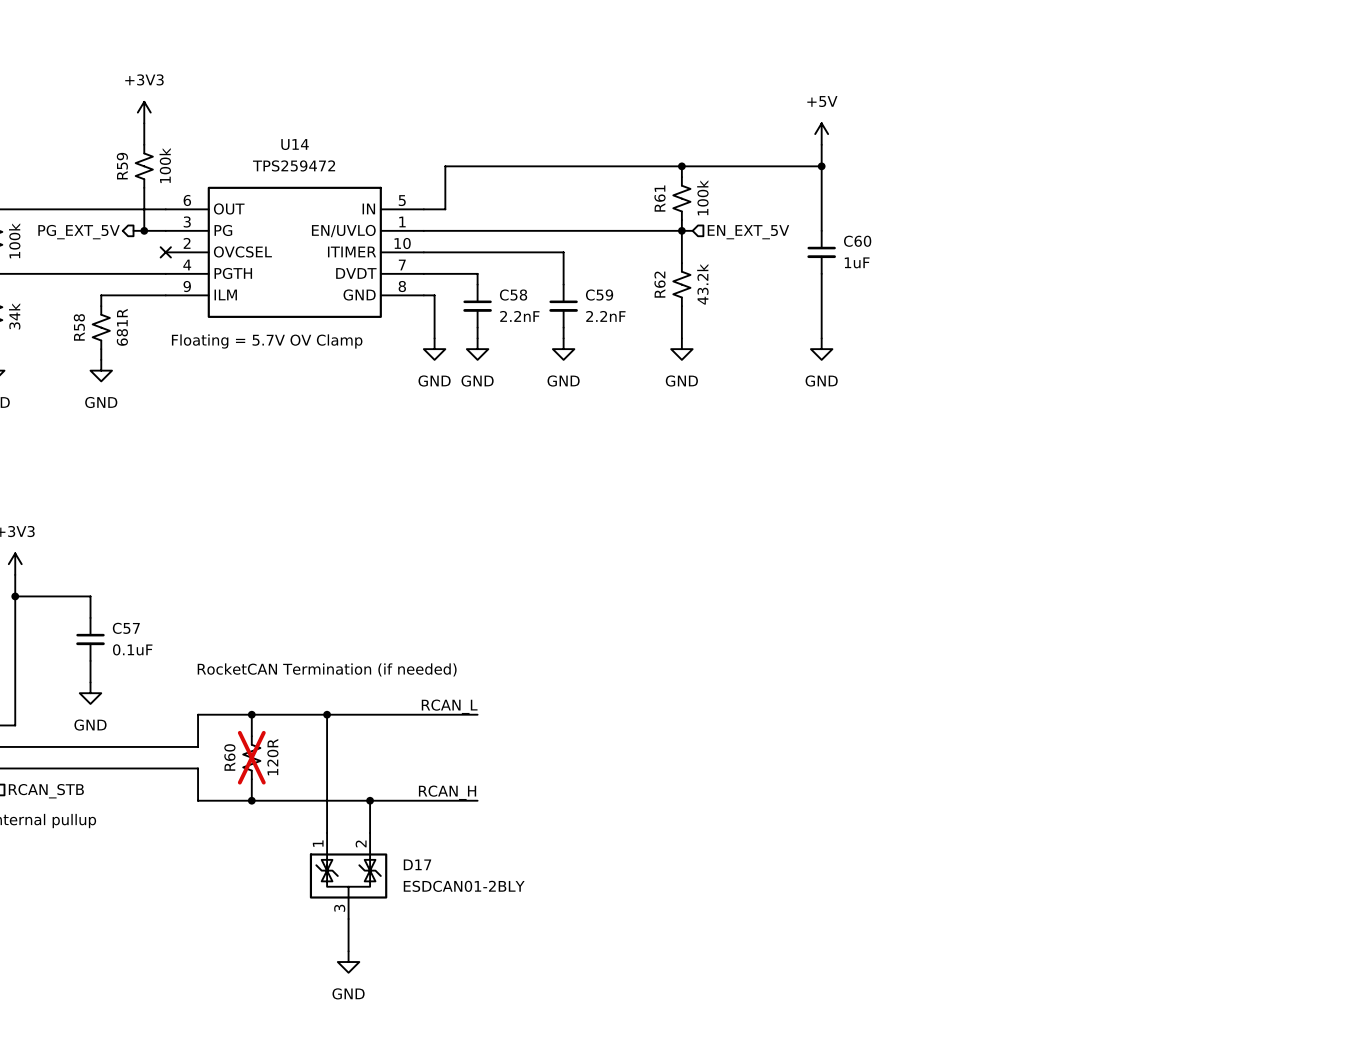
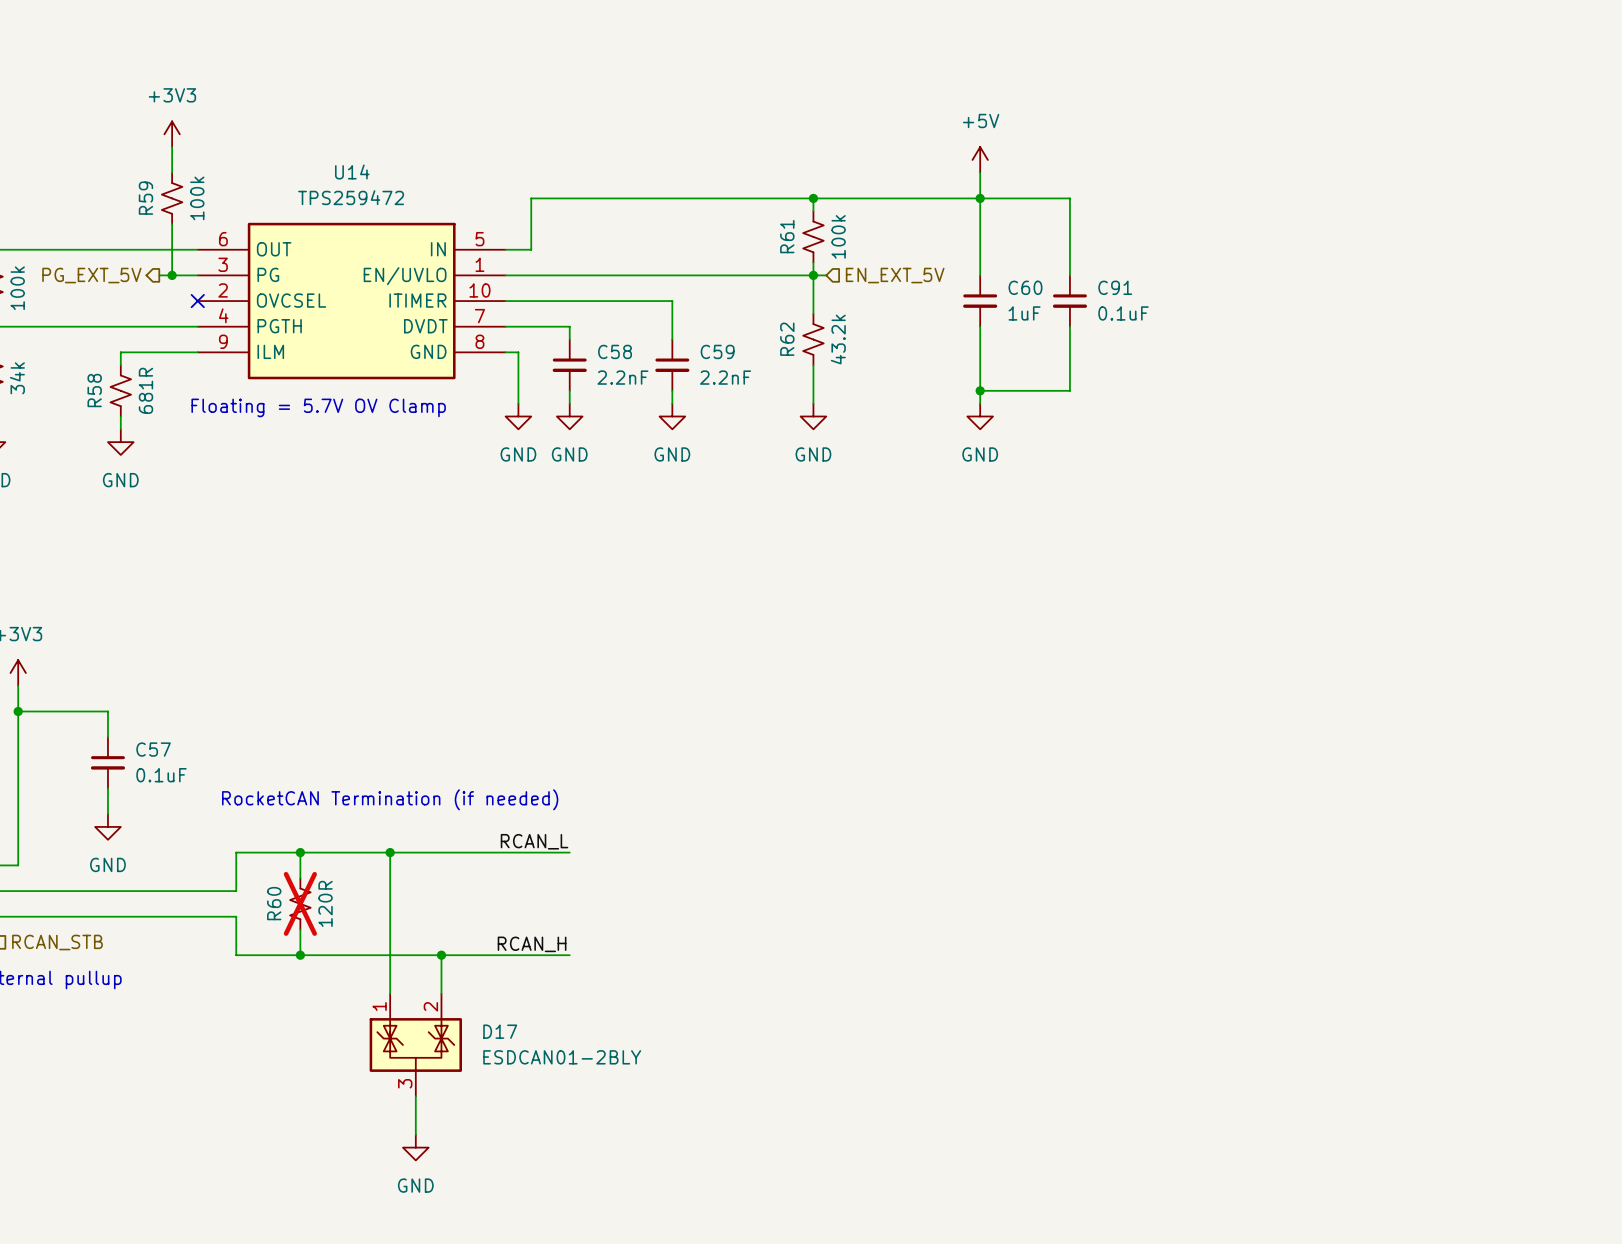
wire: none -> (980, 198) (1069, 198) (1069, 275)
C91: none -> 0.1uF (1069, 301)
wire: none -> (1069, 326) (1069, 390) (980, 390)
junction: none -> (980, 390)

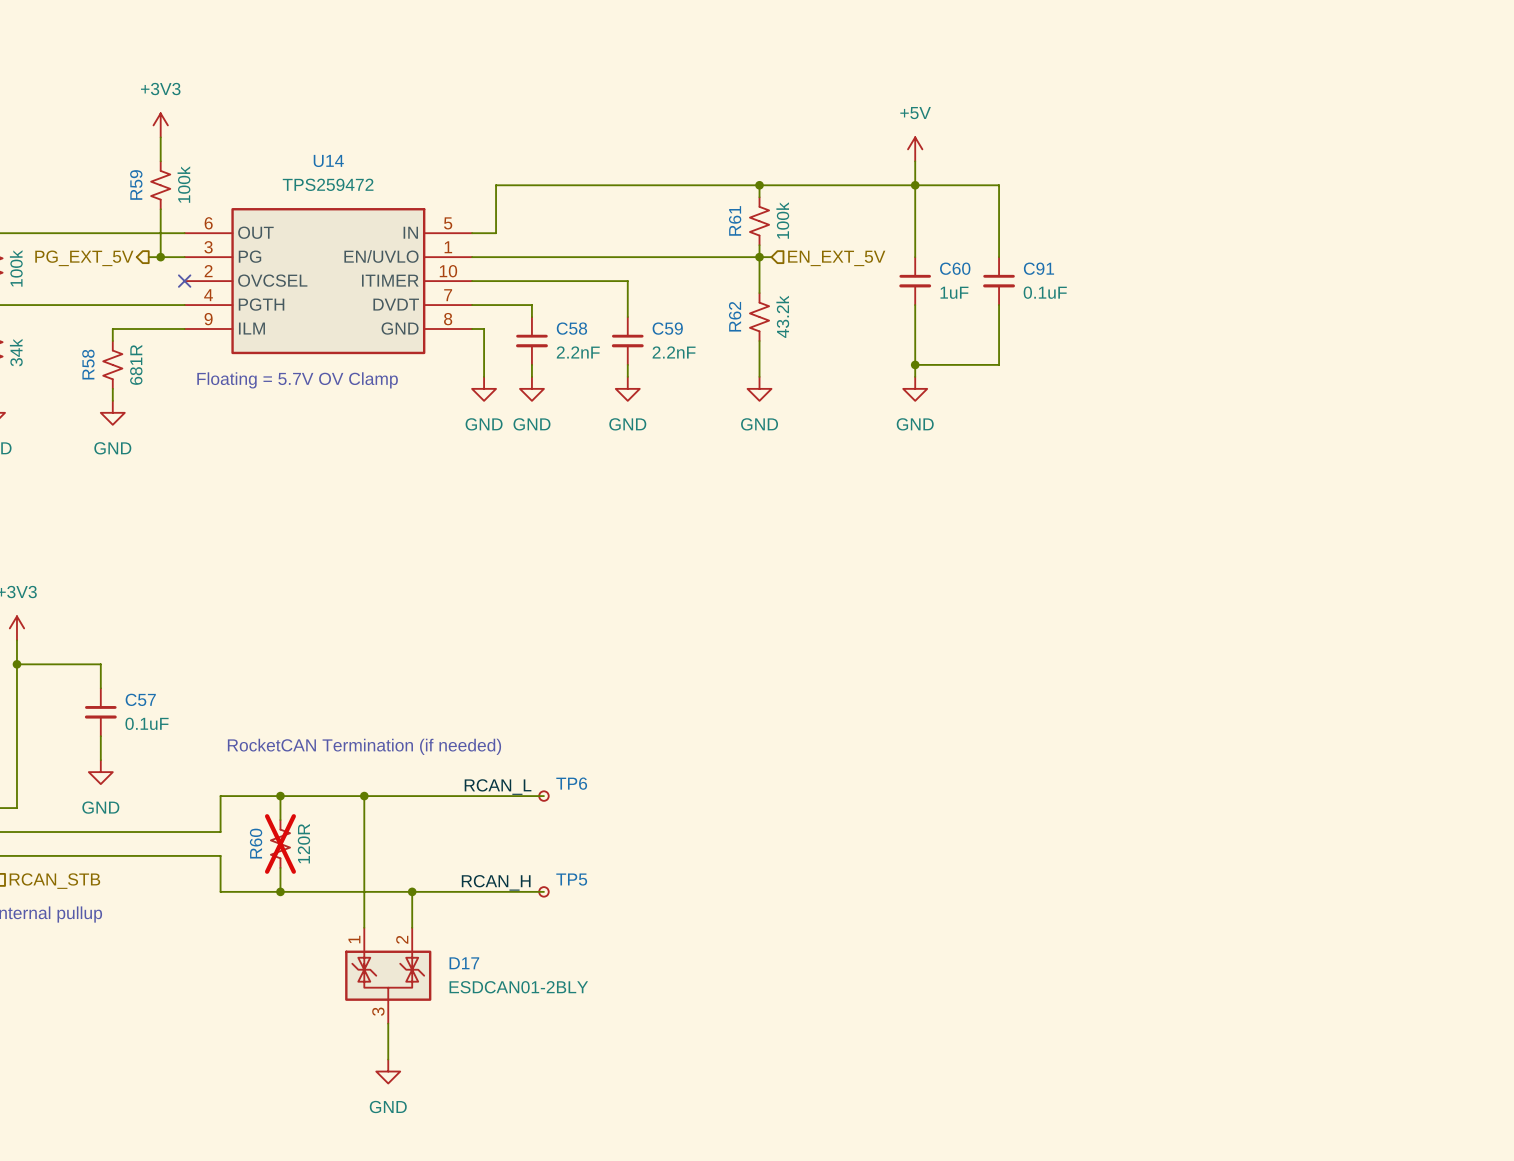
wire: none -> (531, 796) (543, 796)
TP6: none -> (543, 796)
wire: none -> (531, 891) (543, 891)
TP5: none -> (543, 891)

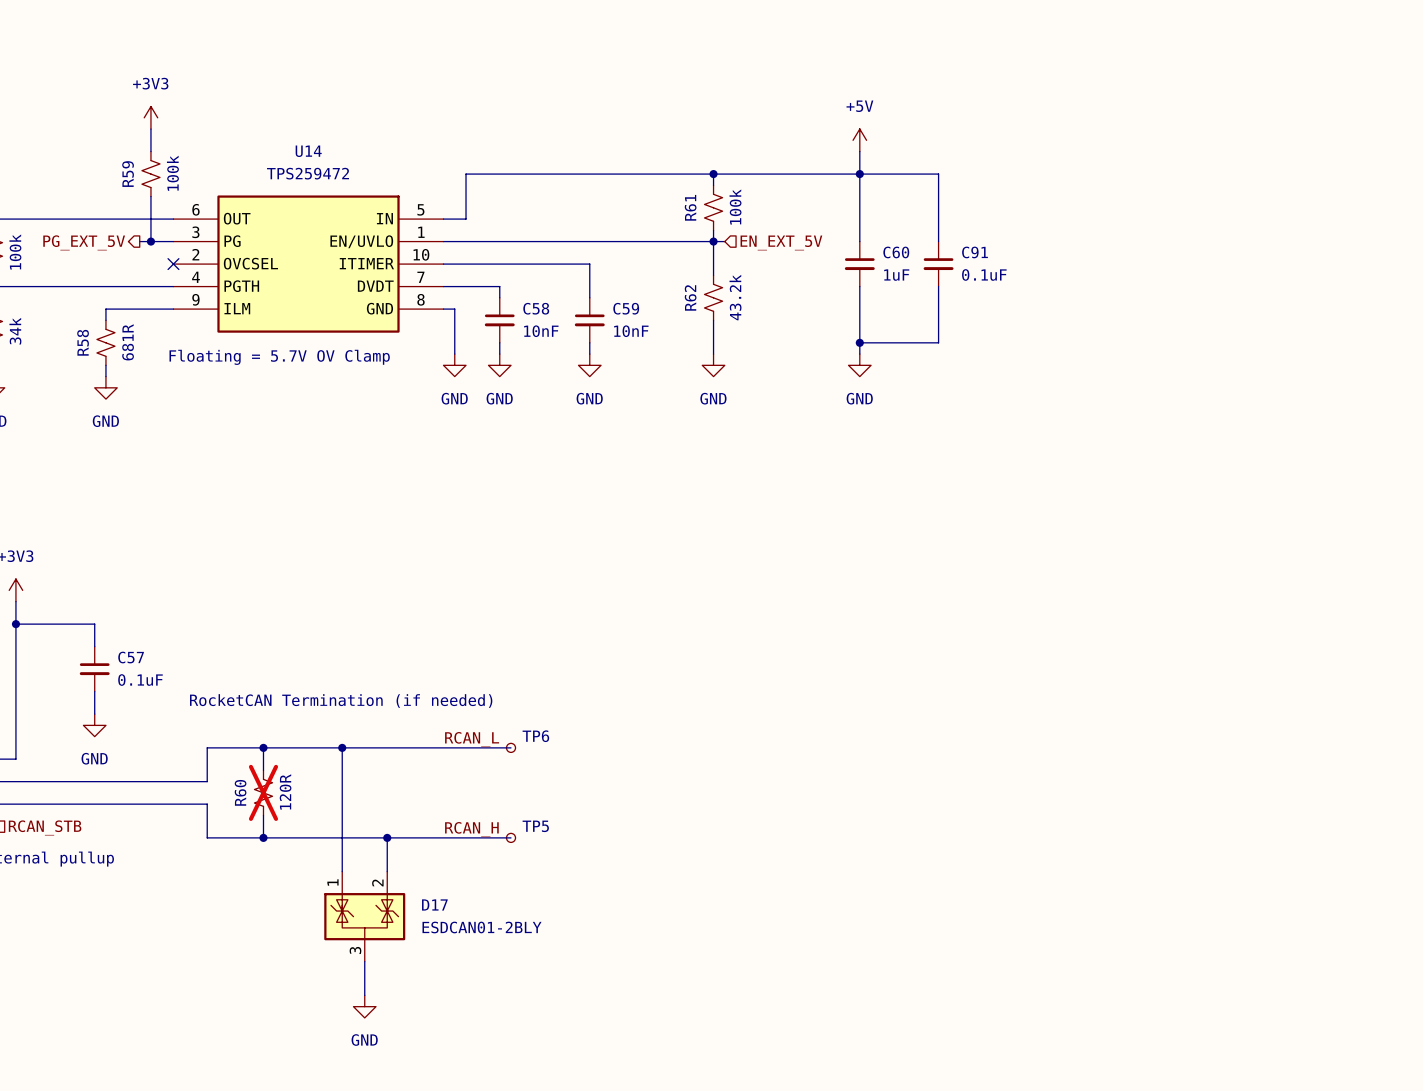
C58 value: 2.2nF (578, 352) -> 10nF (541, 331)
C59 value: 2.2nF (674, 352) -> 10nF (631, 331)

